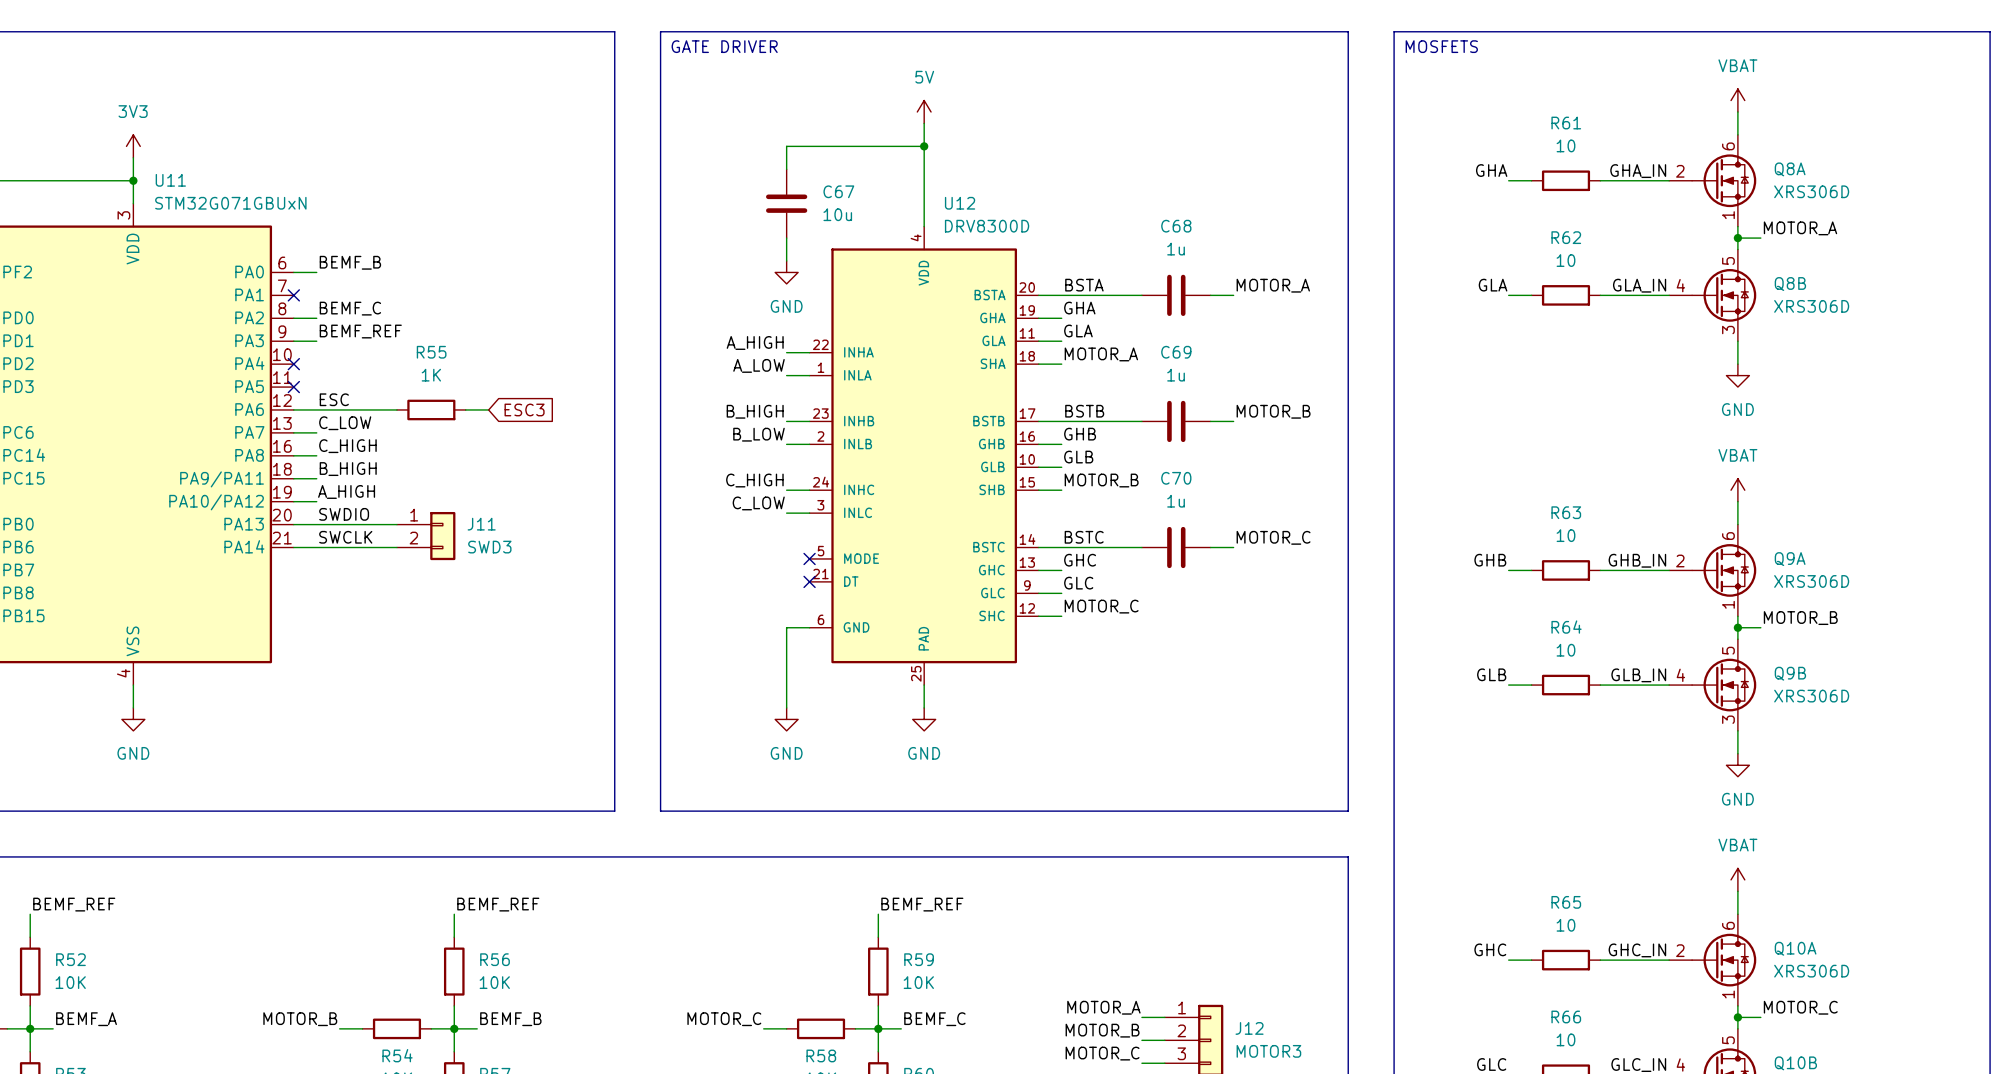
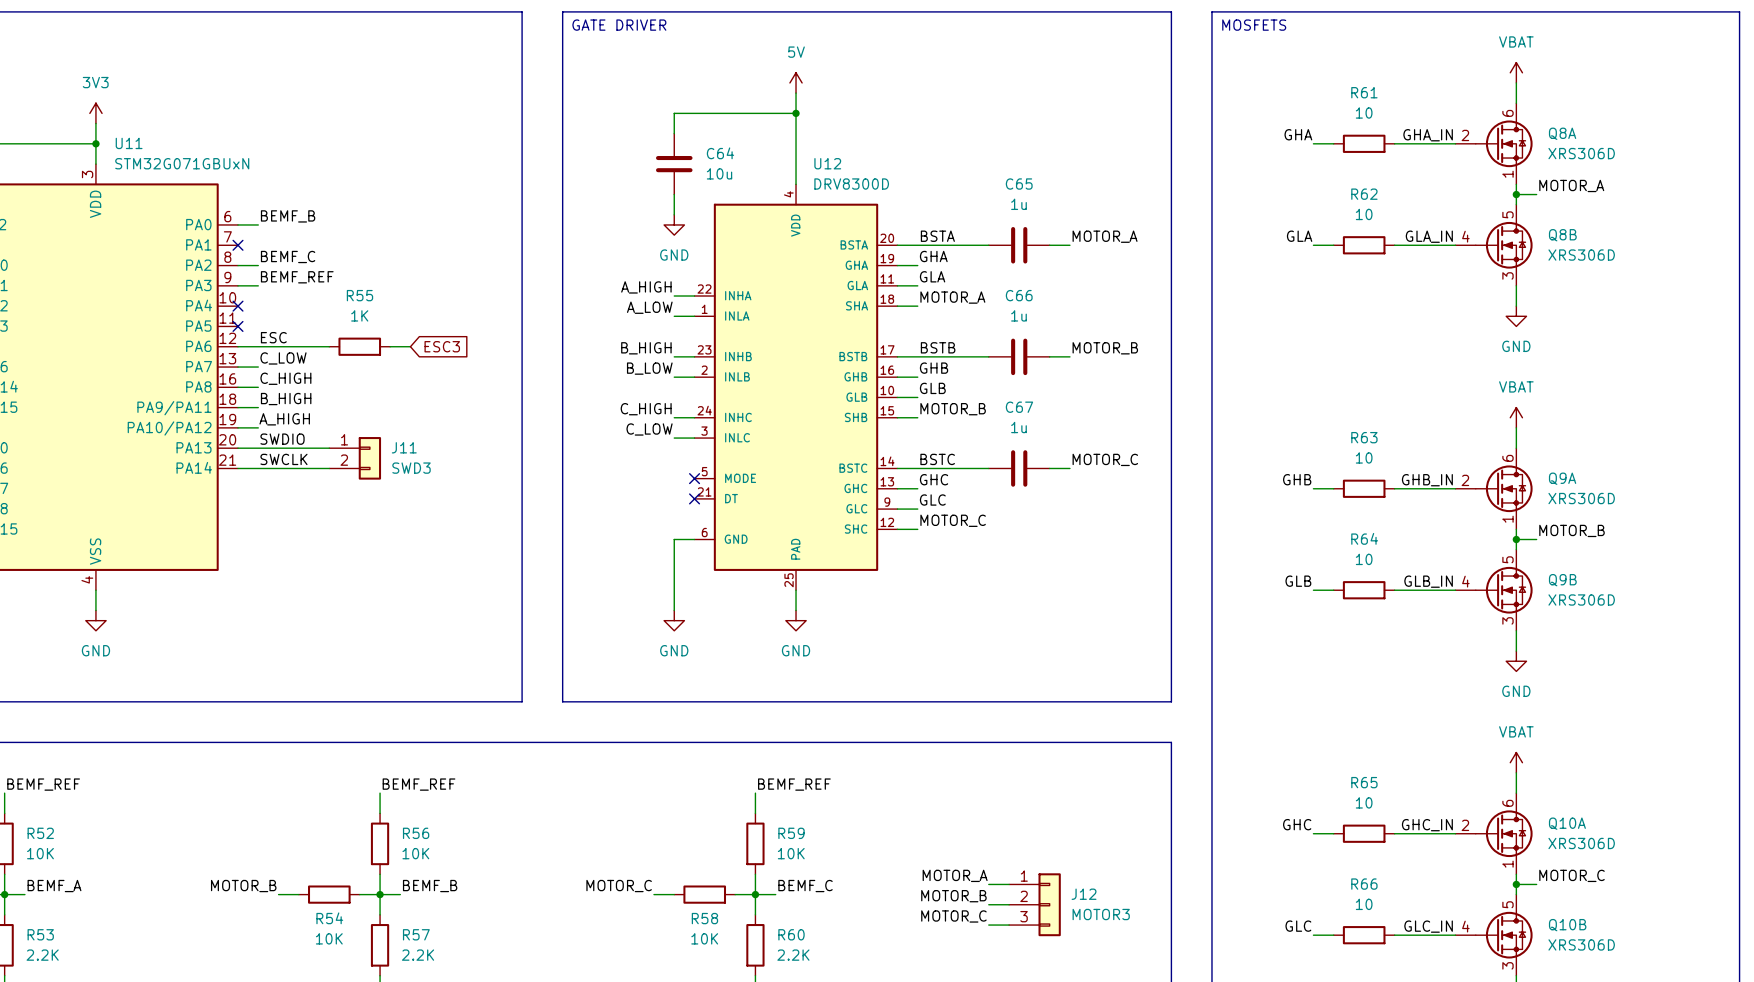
C67 name: C67 (838, 191) -> C64 (720, 153)
C68 name: C68 (1176, 226) -> C65 (1019, 184)
C69 name: C69 (1176, 352) -> C66 (1019, 295)
C70 name: C70 (1176, 478) -> C67 (1019, 407)

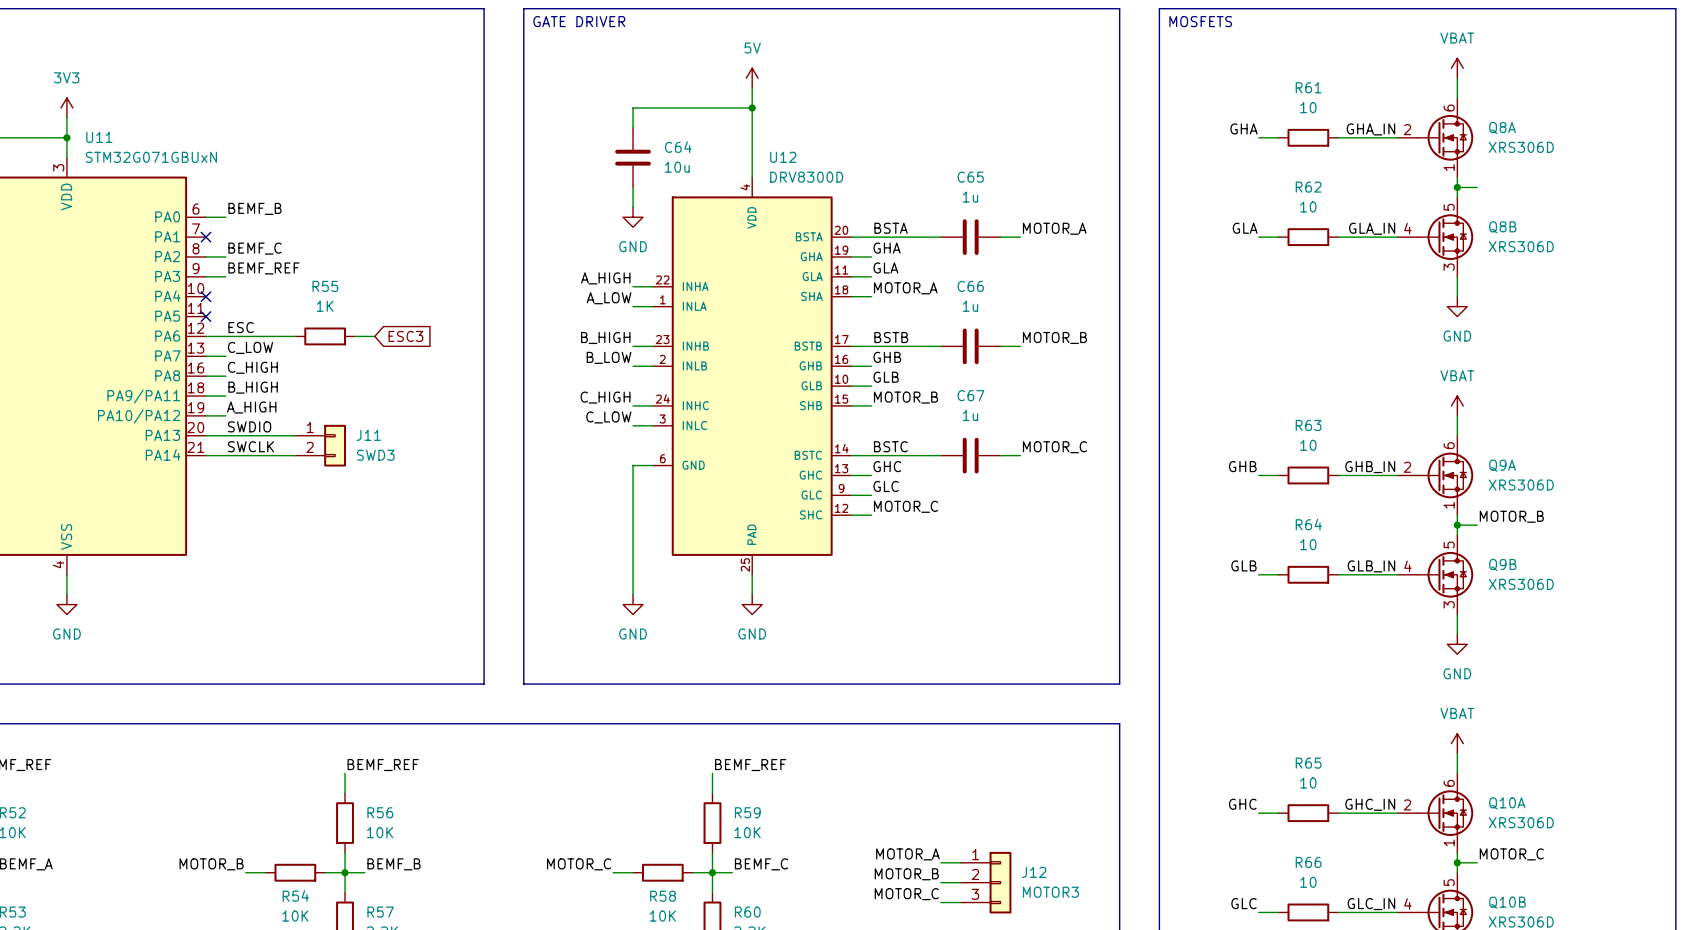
U12 symbol: [694, 184, 898, 591] -> [652, 177, 852, 575]
label: MOTOR_A (1571, 185) -> none
no-connect mark: (694, 478) -> none
no-connect mark: (694, 498) -> none
wire: (674, 539) (694, 539) -> (633, 525) (633, 465) (652, 465)

